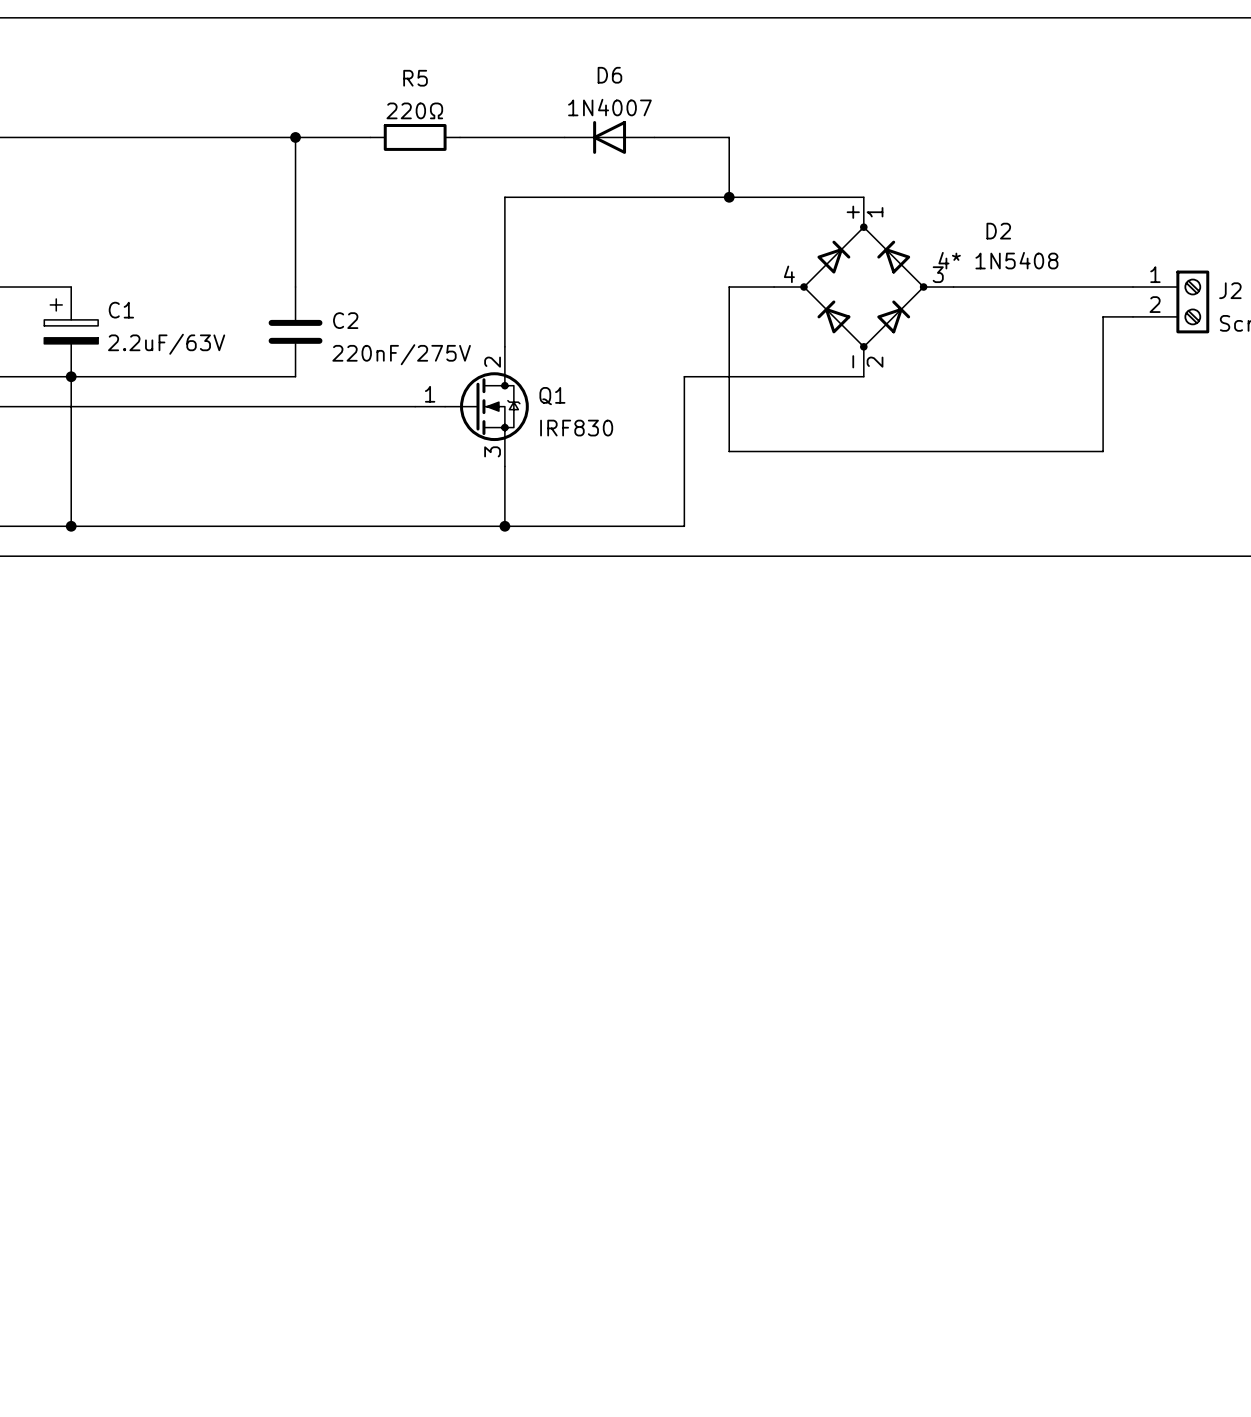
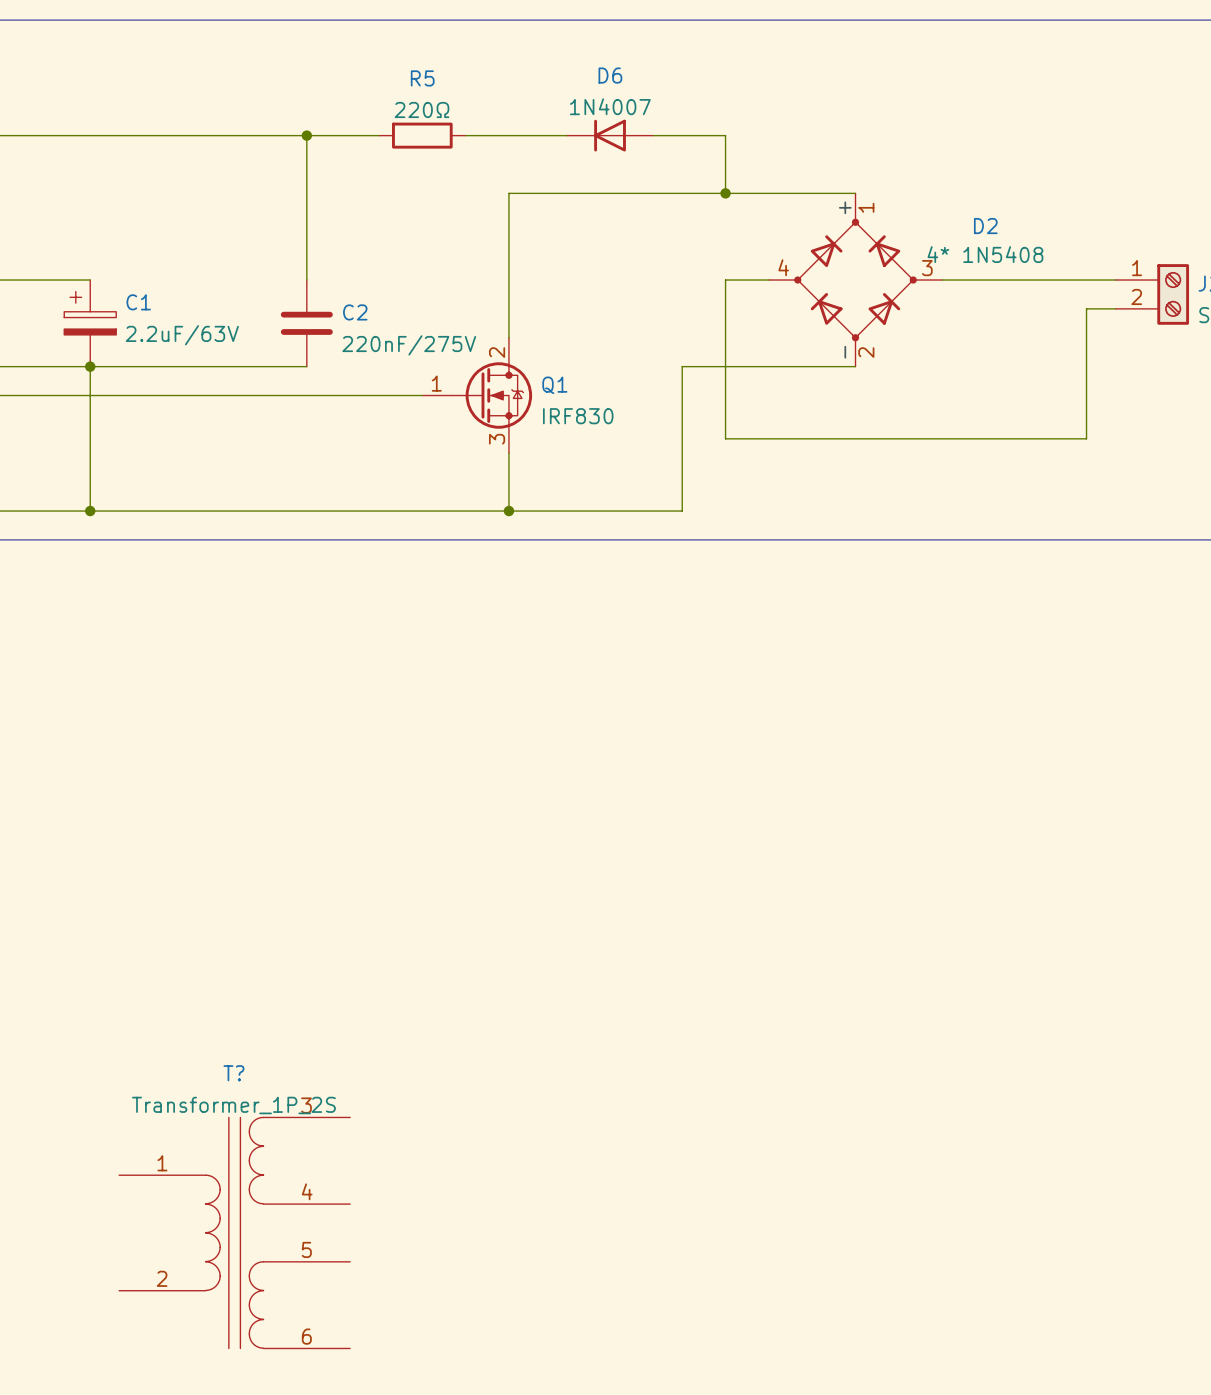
T?: none -> Transformer_1P_2S (234, 1232)

